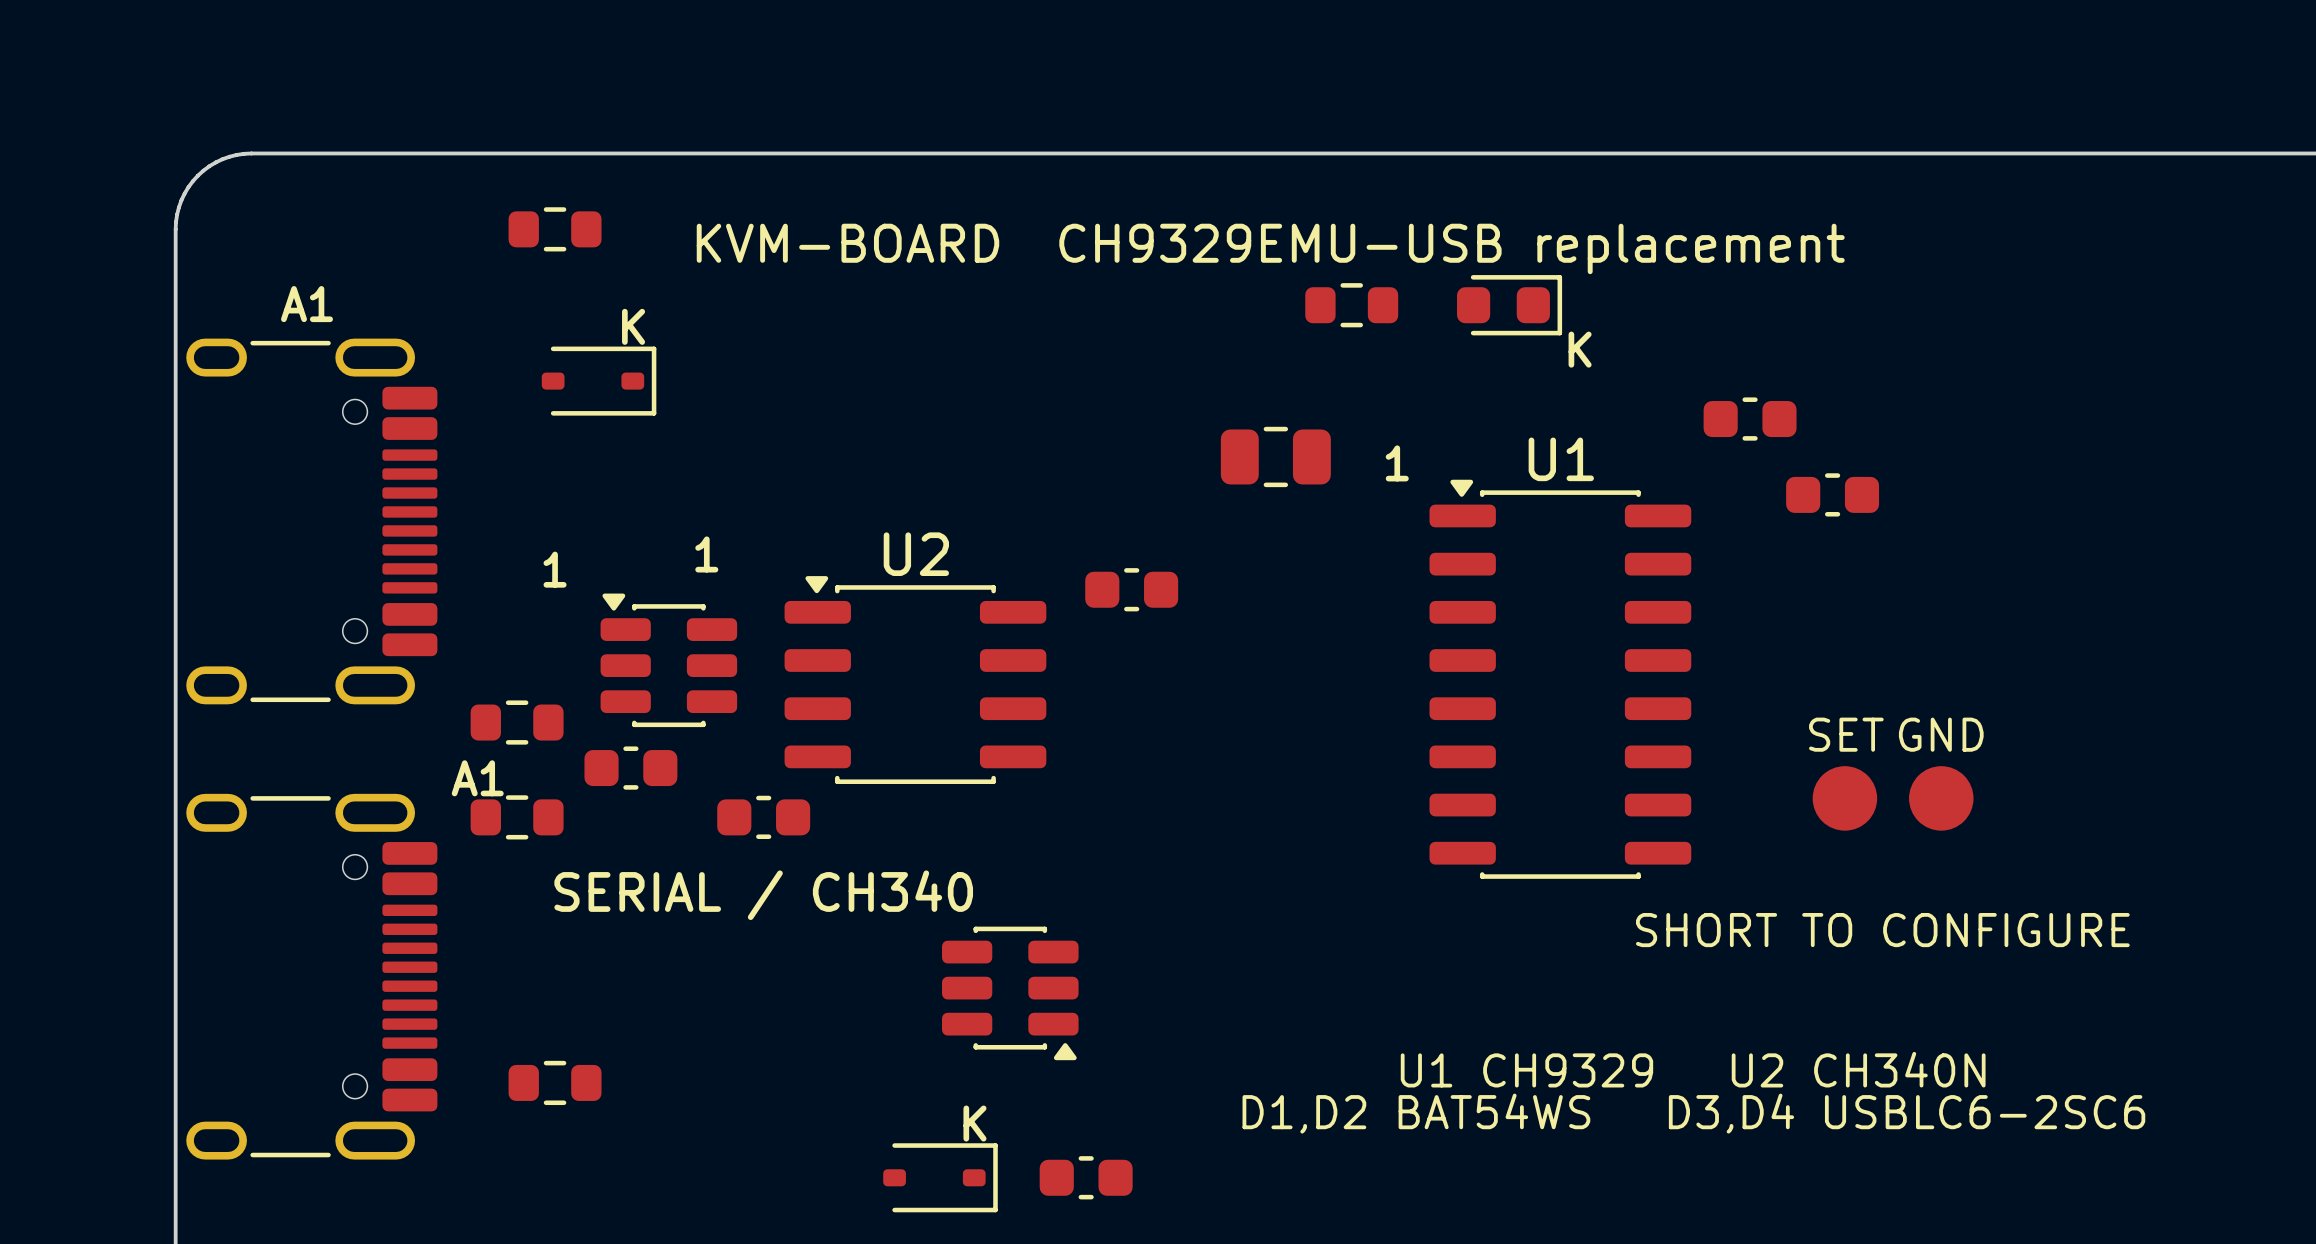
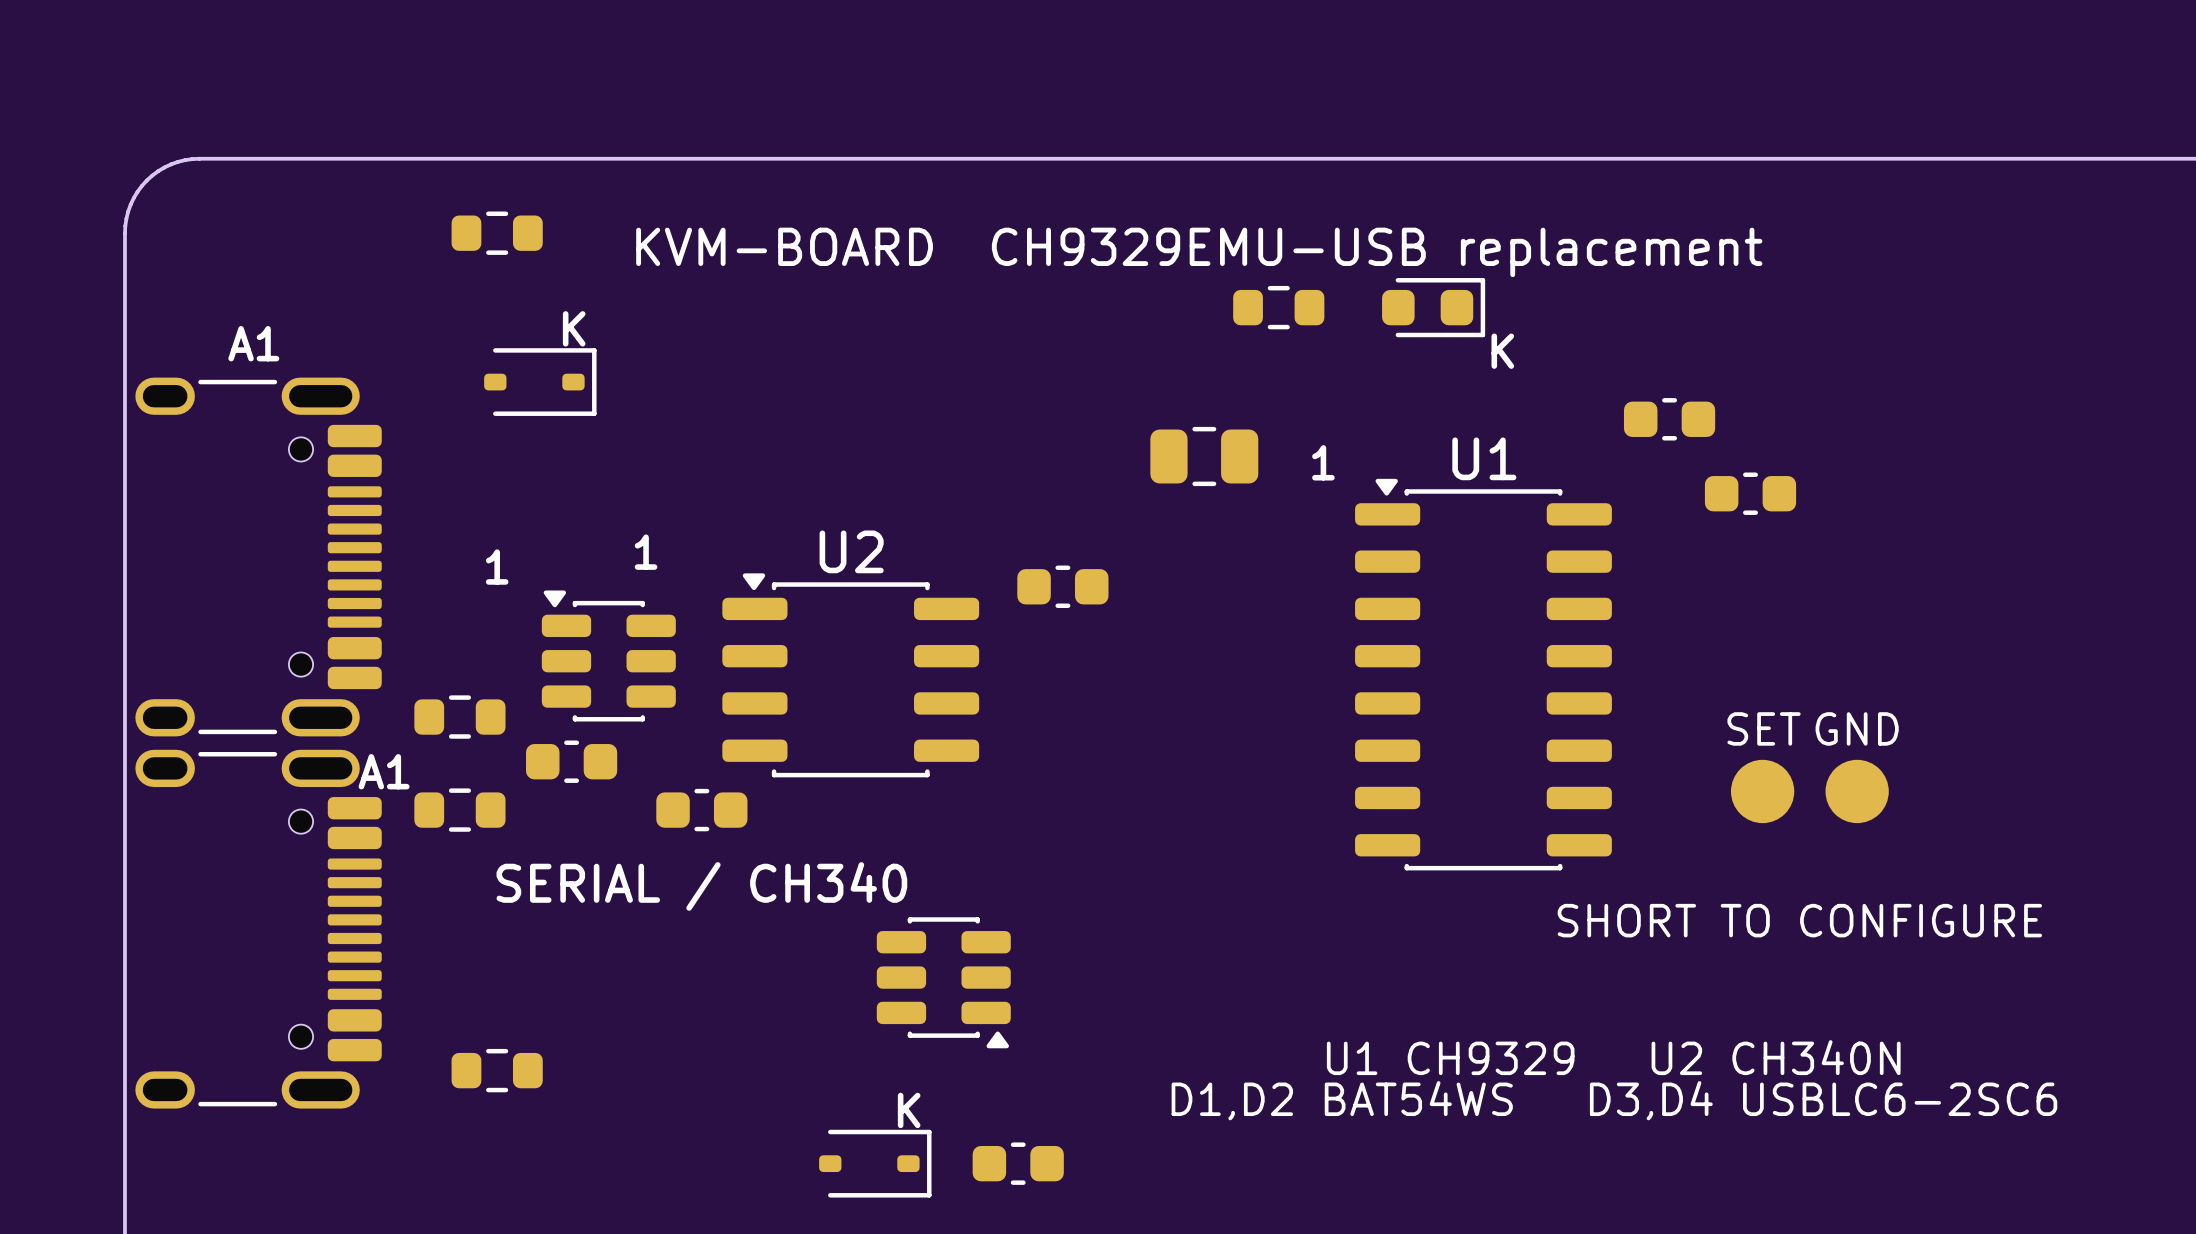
text position: A1 (307, 304) -> A1 (253, 343)
part position: (311, 521) -> (258, 556)
text position: A1 (477, 778) -> A1 (384, 771)
part position: (311, 976) -> (258, 929)

